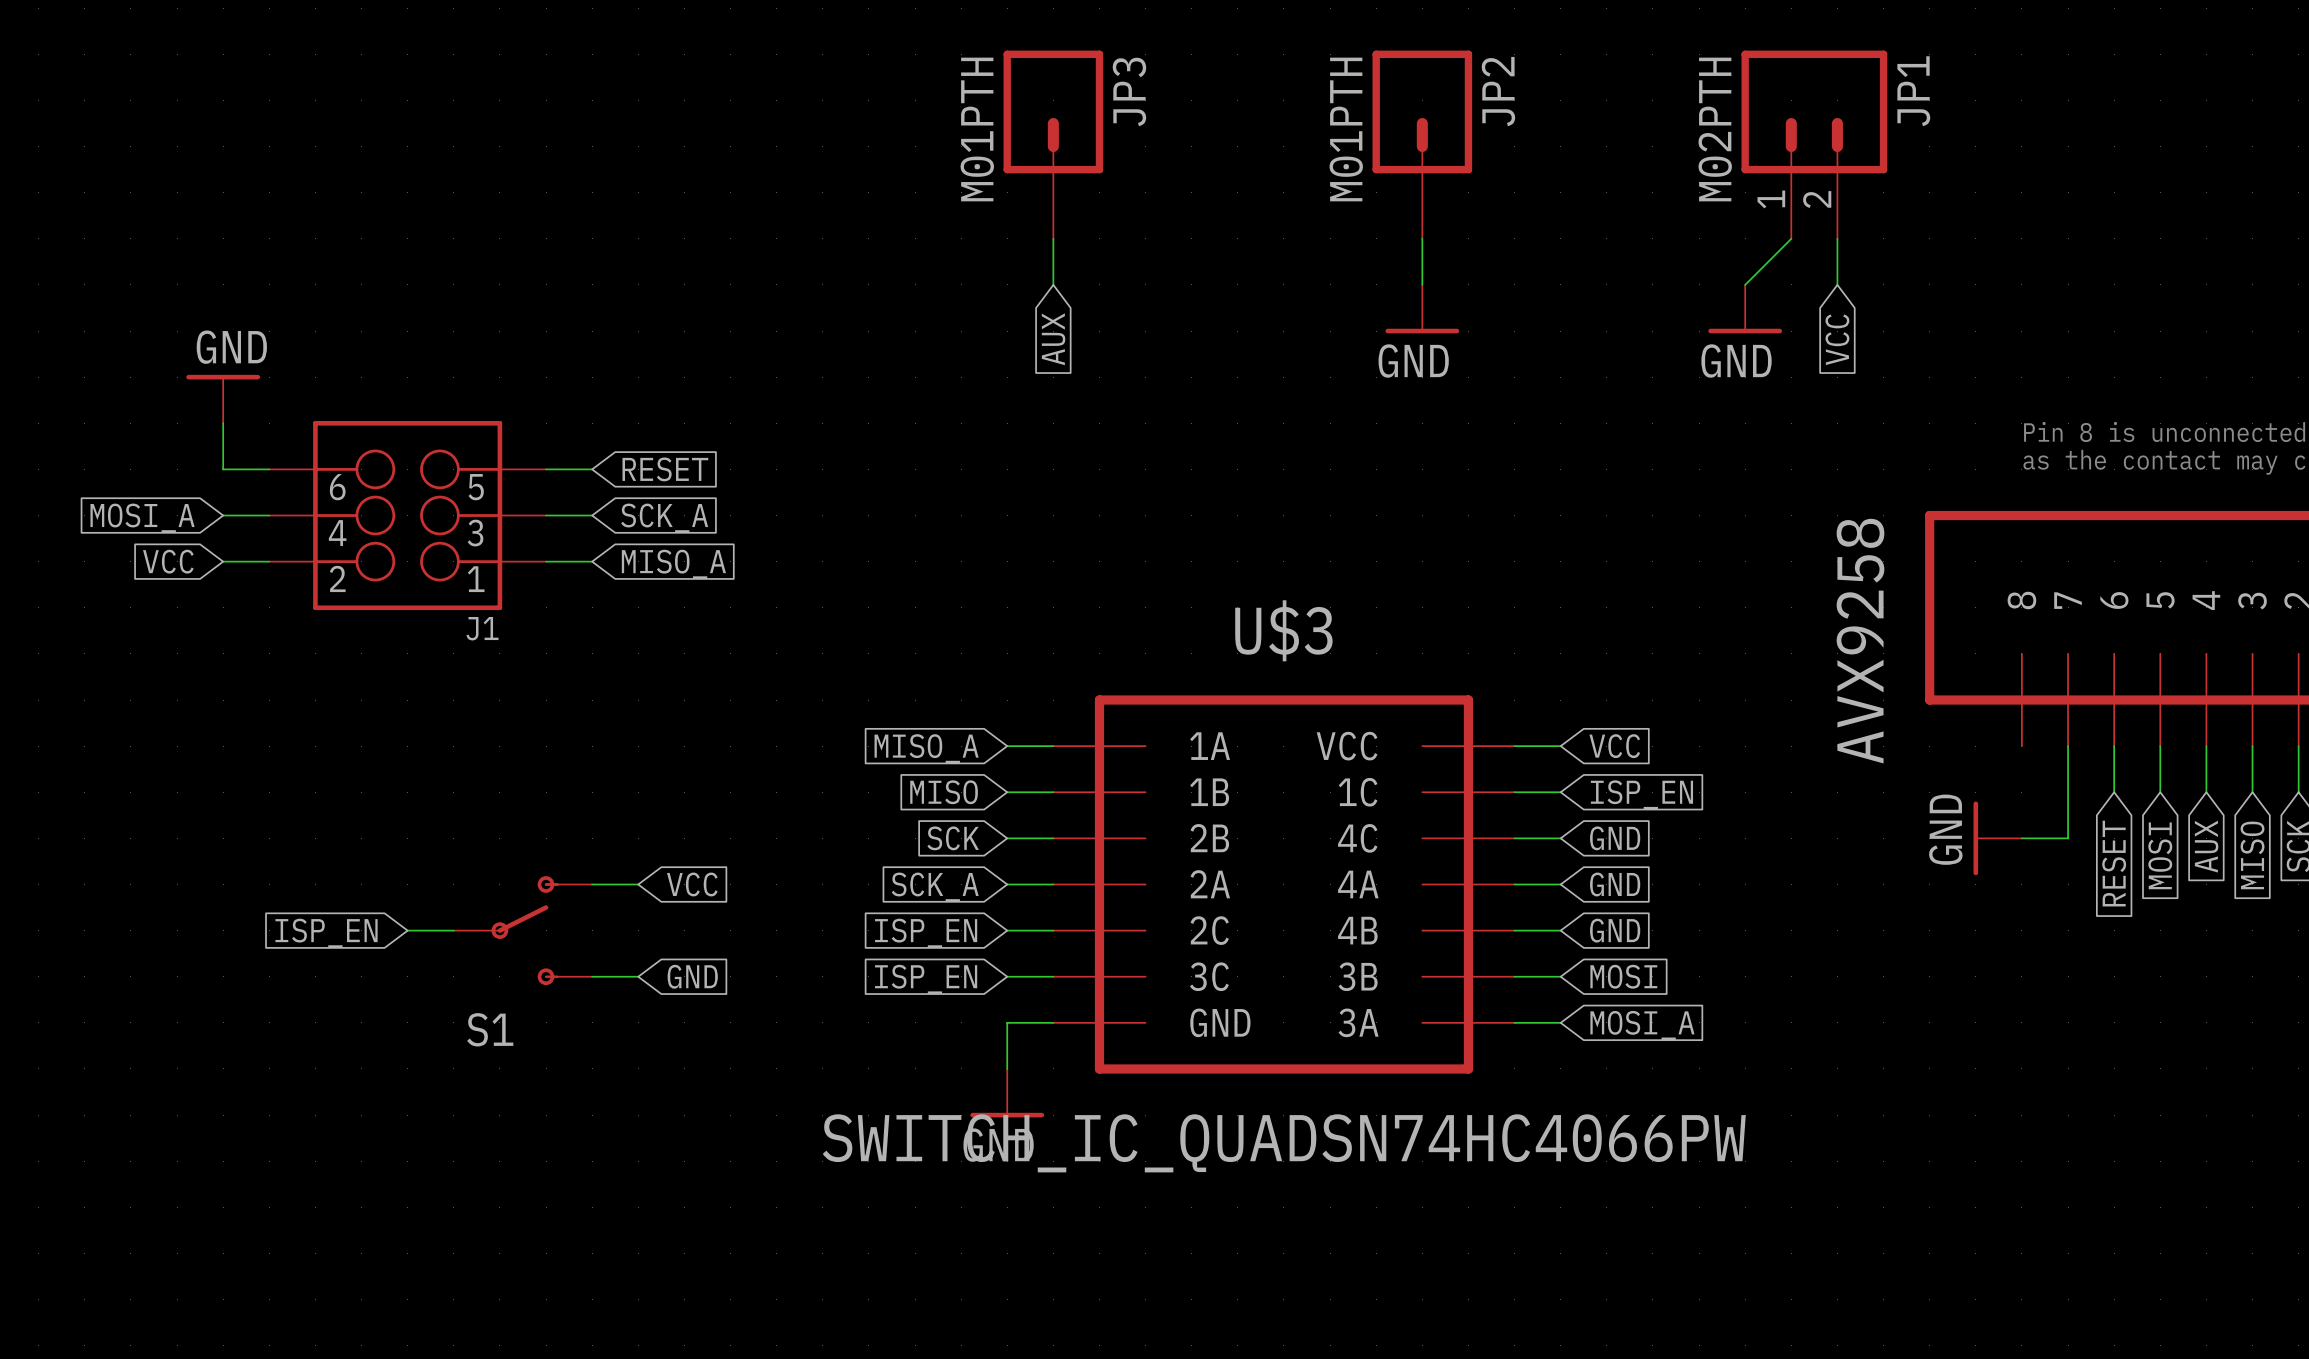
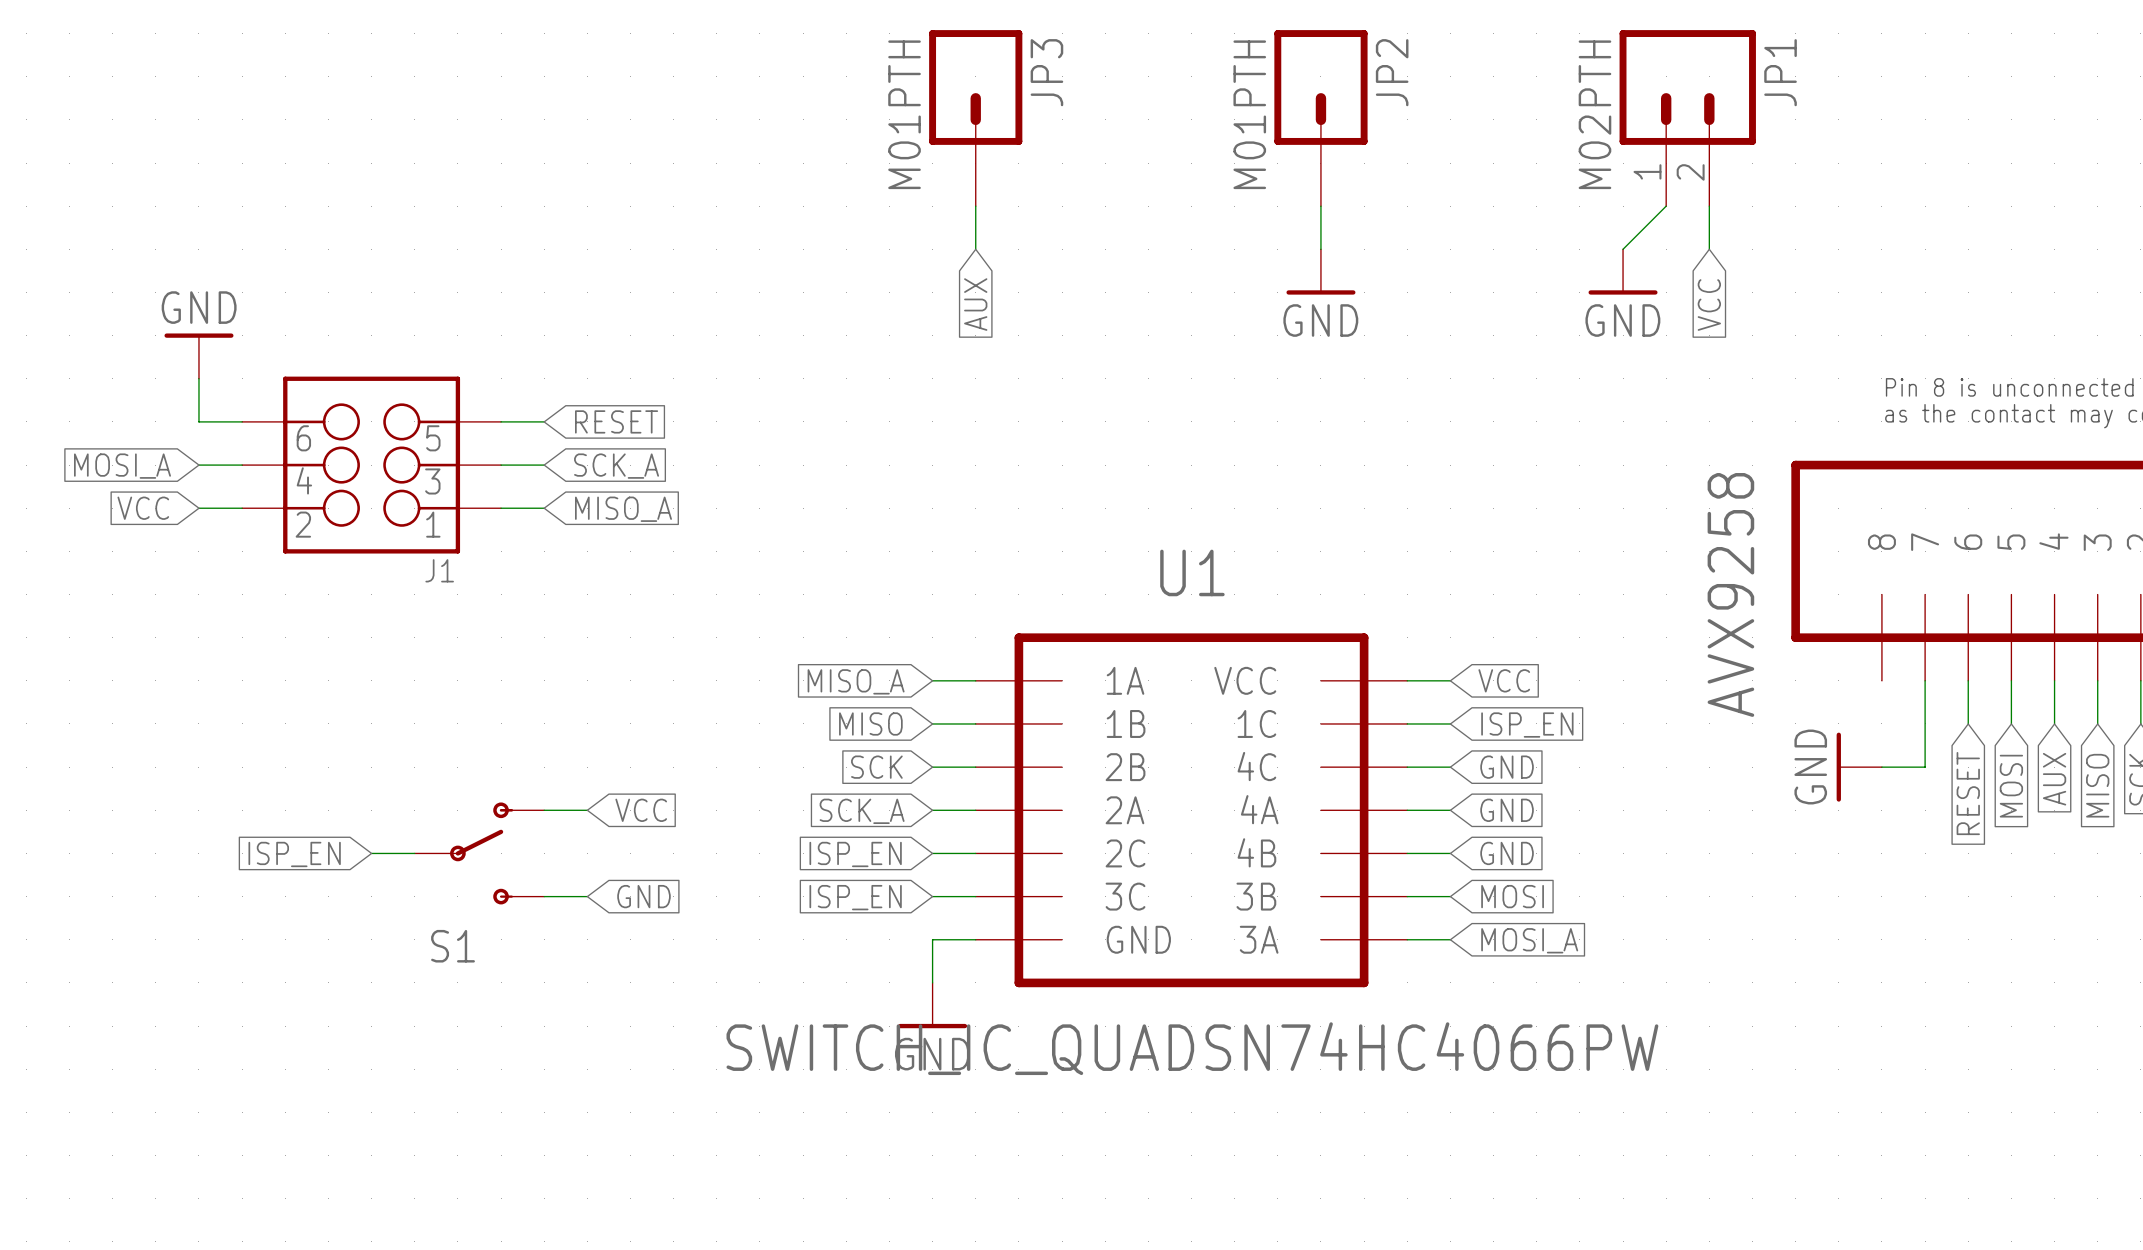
U$3 name: U$3 (1283, 630) -> U1 (1192, 572)

